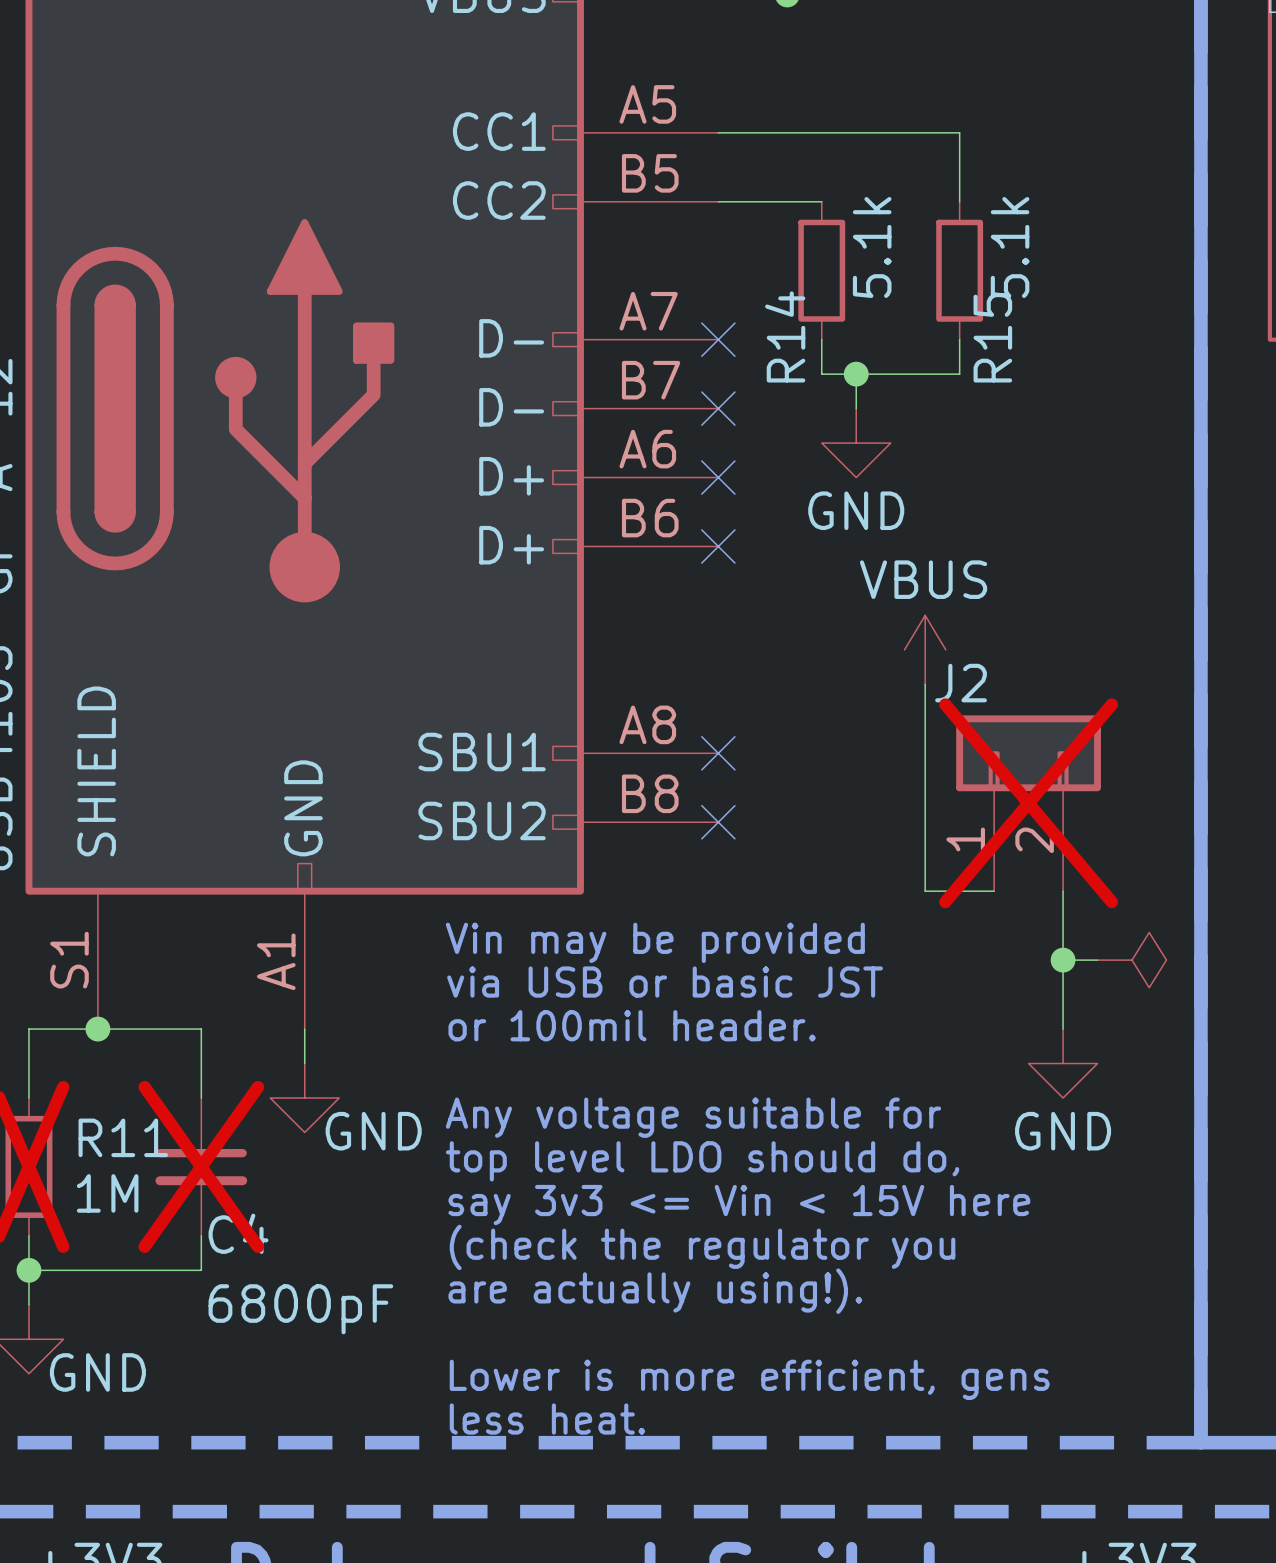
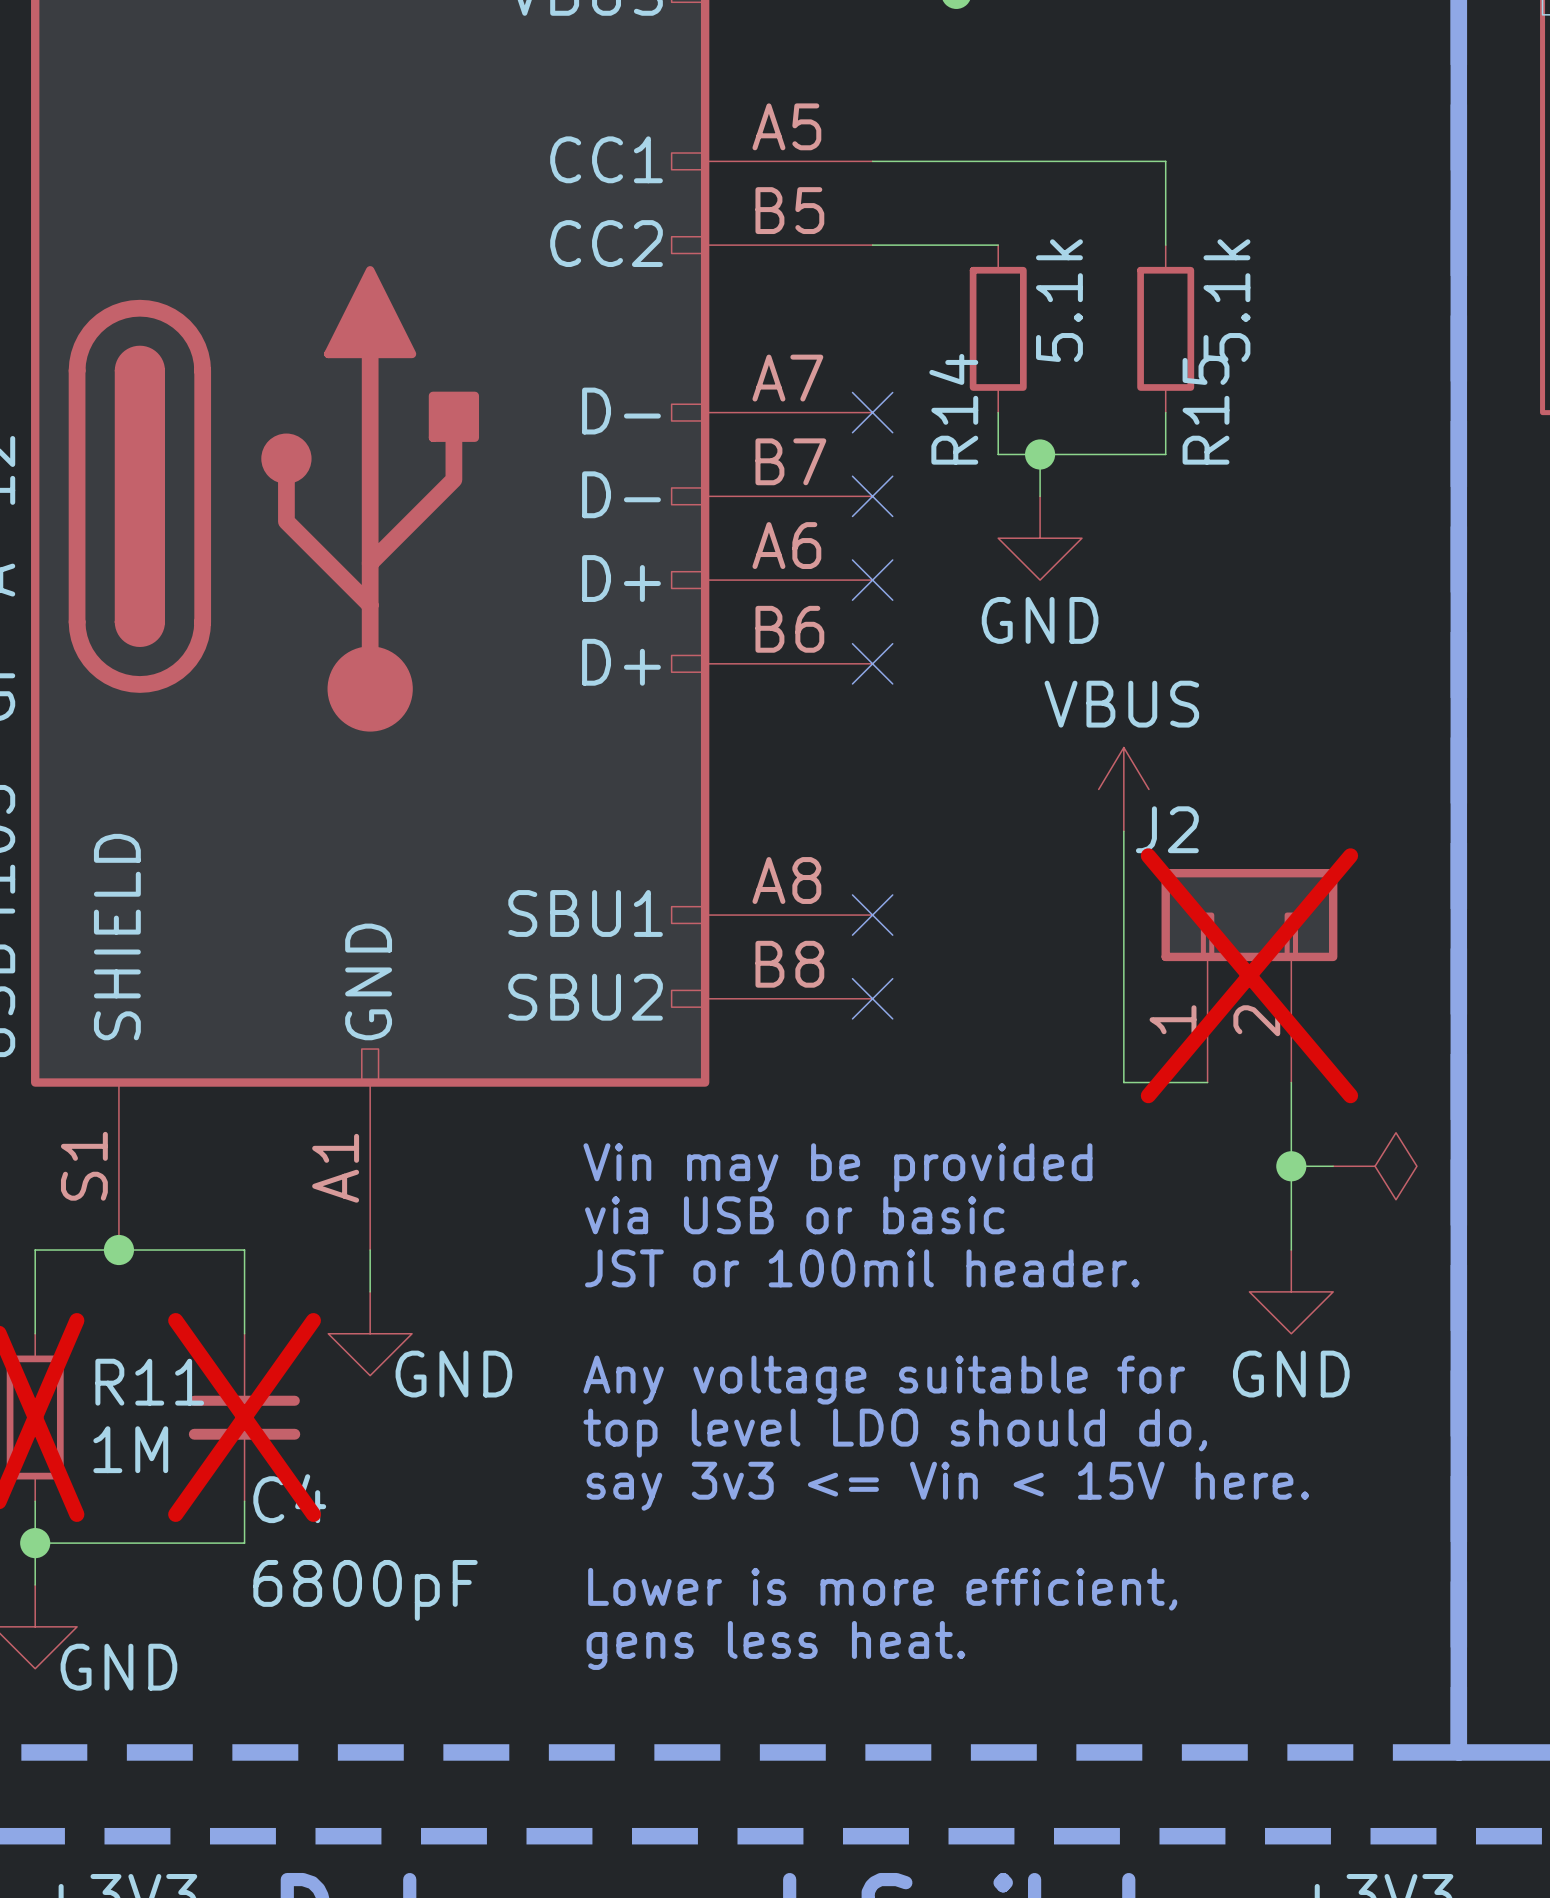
text position: Vin may be provided (655, 942) -> Vin may be provided (837, 1167)
text: via USB or basic JST (665, 982) -> via USB or basic (794, 1215)
text: or 100mil header. (632, 1025) -> JST or 100mil header. (862, 1268)
text position: Any voltage suitable for (693, 1117) -> Any voltage suitable for (884, 1380)
text position: top level LDO should do, (702, 1161) -> top level LDO should do, (895, 1433)
text: say 3v3 <= Vin < 15V here (739, 1205) -> say 3v3 <= Vin < 15V here. (947, 1486)
text: (check the regulator you (702, 1247) -> none
text: are actually using!). (655, 1291) -> none
text: none -> Lower is more efficient, (882, 1589)
text: none -> gens less heat. (775, 1645)
text: Lower is more efficient, gens (749, 1379) -> none
text: less heat. (547, 1419) -> none

